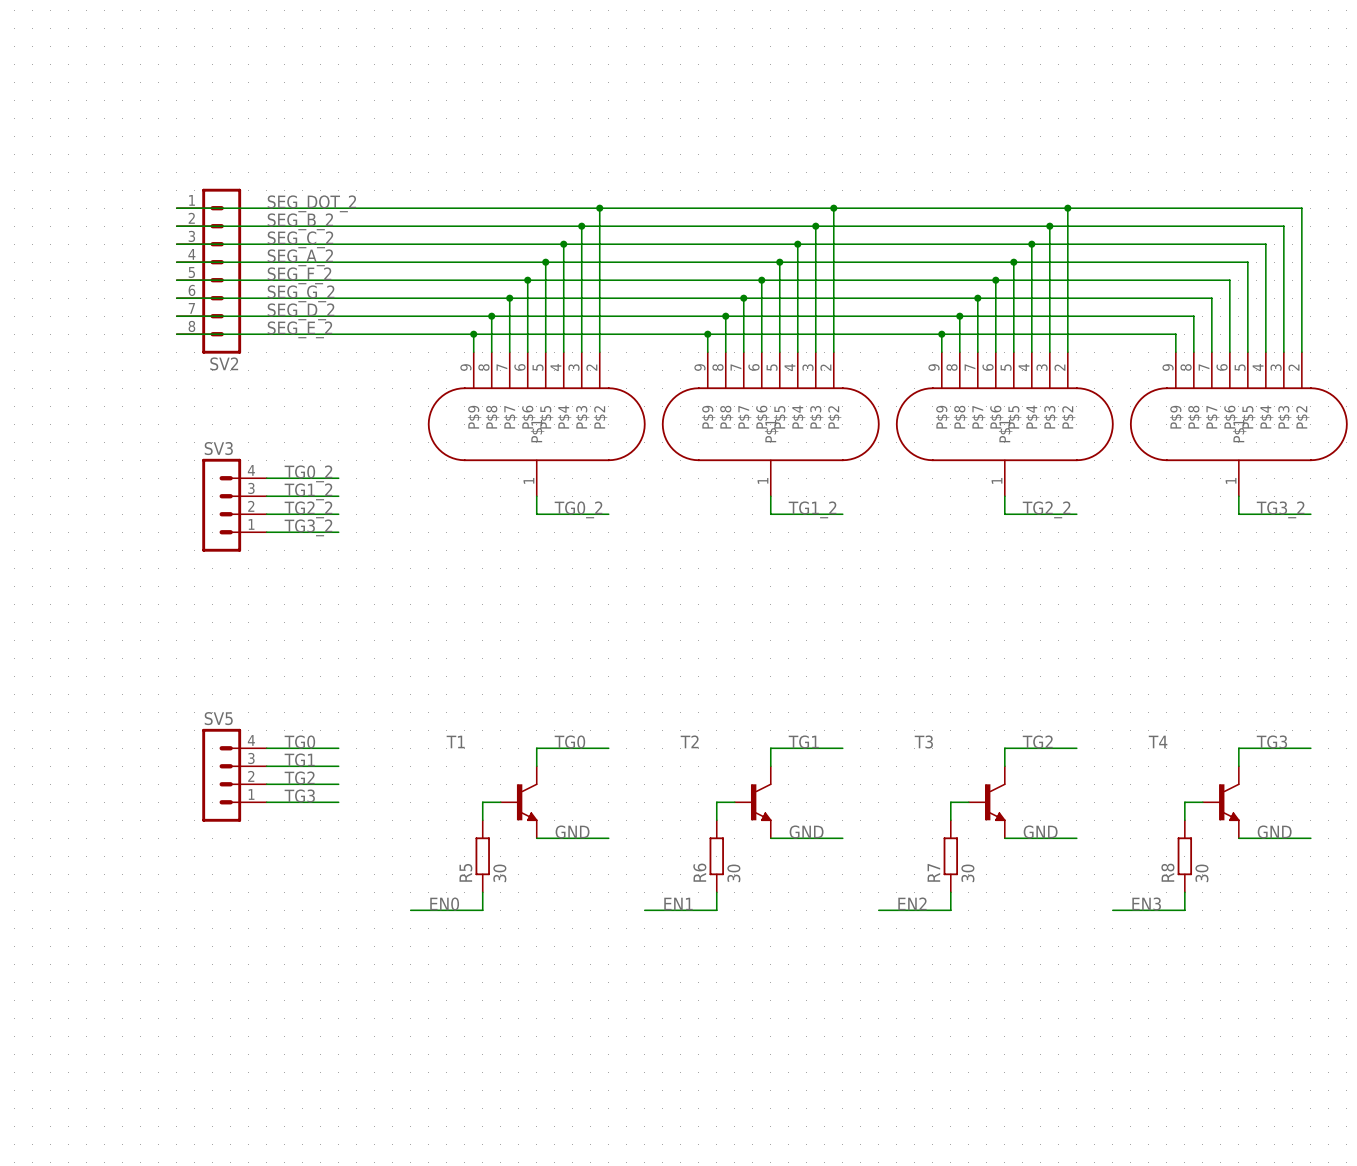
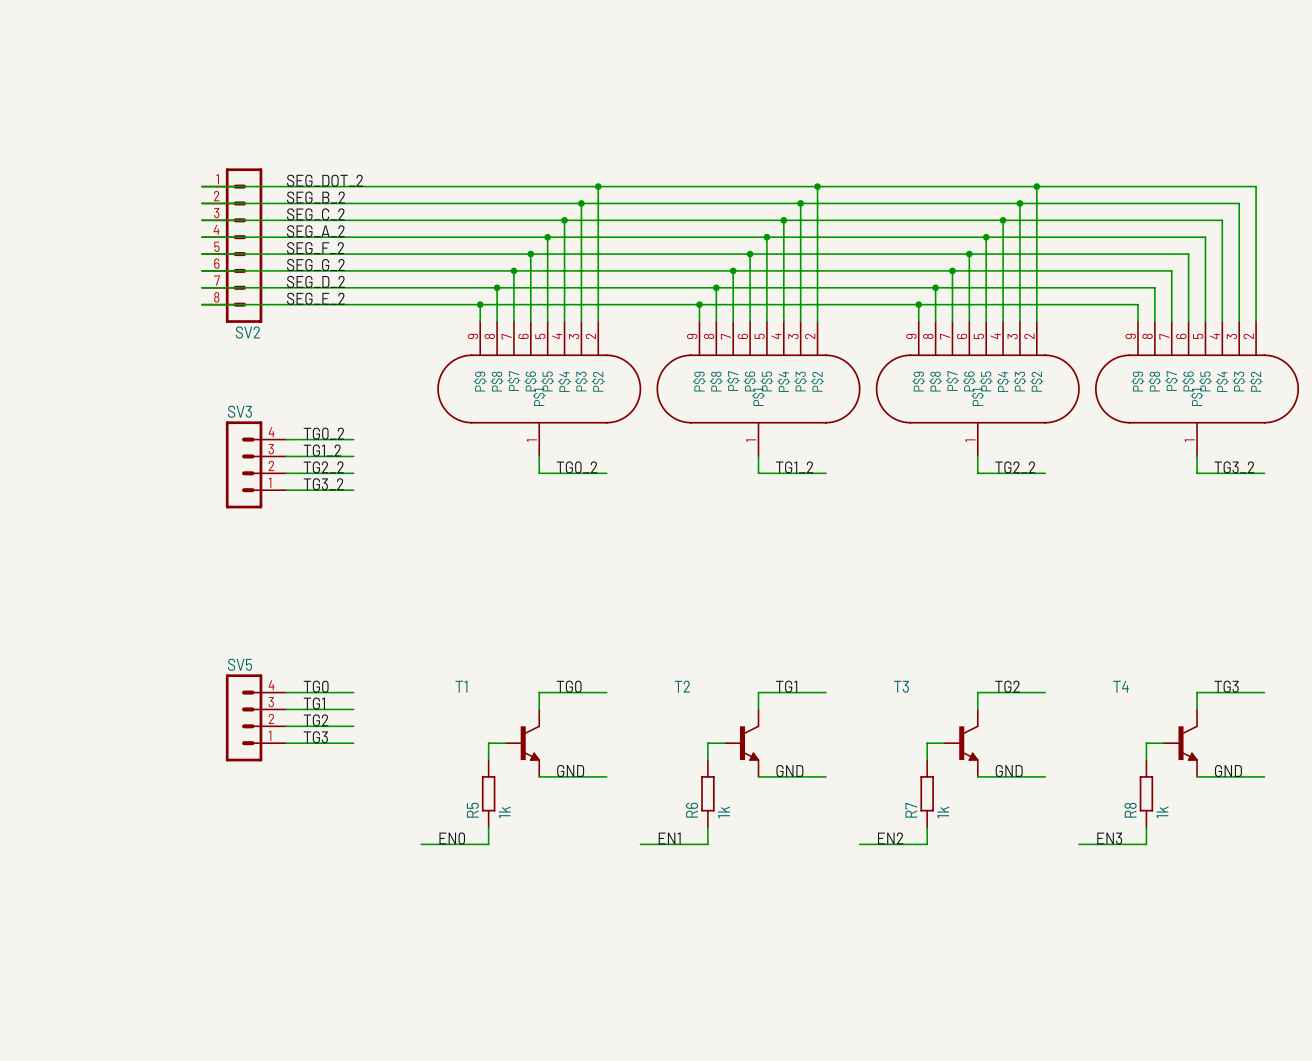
R5 value: 30 (499, 873) -> 1k (504, 812)
R6 value: 30 (733, 873) -> 1k (723, 812)
R7 value: 30 (967, 873) -> 1k (943, 812)
R8 value: 30 (1201, 873) -> 1k (1162, 812)

